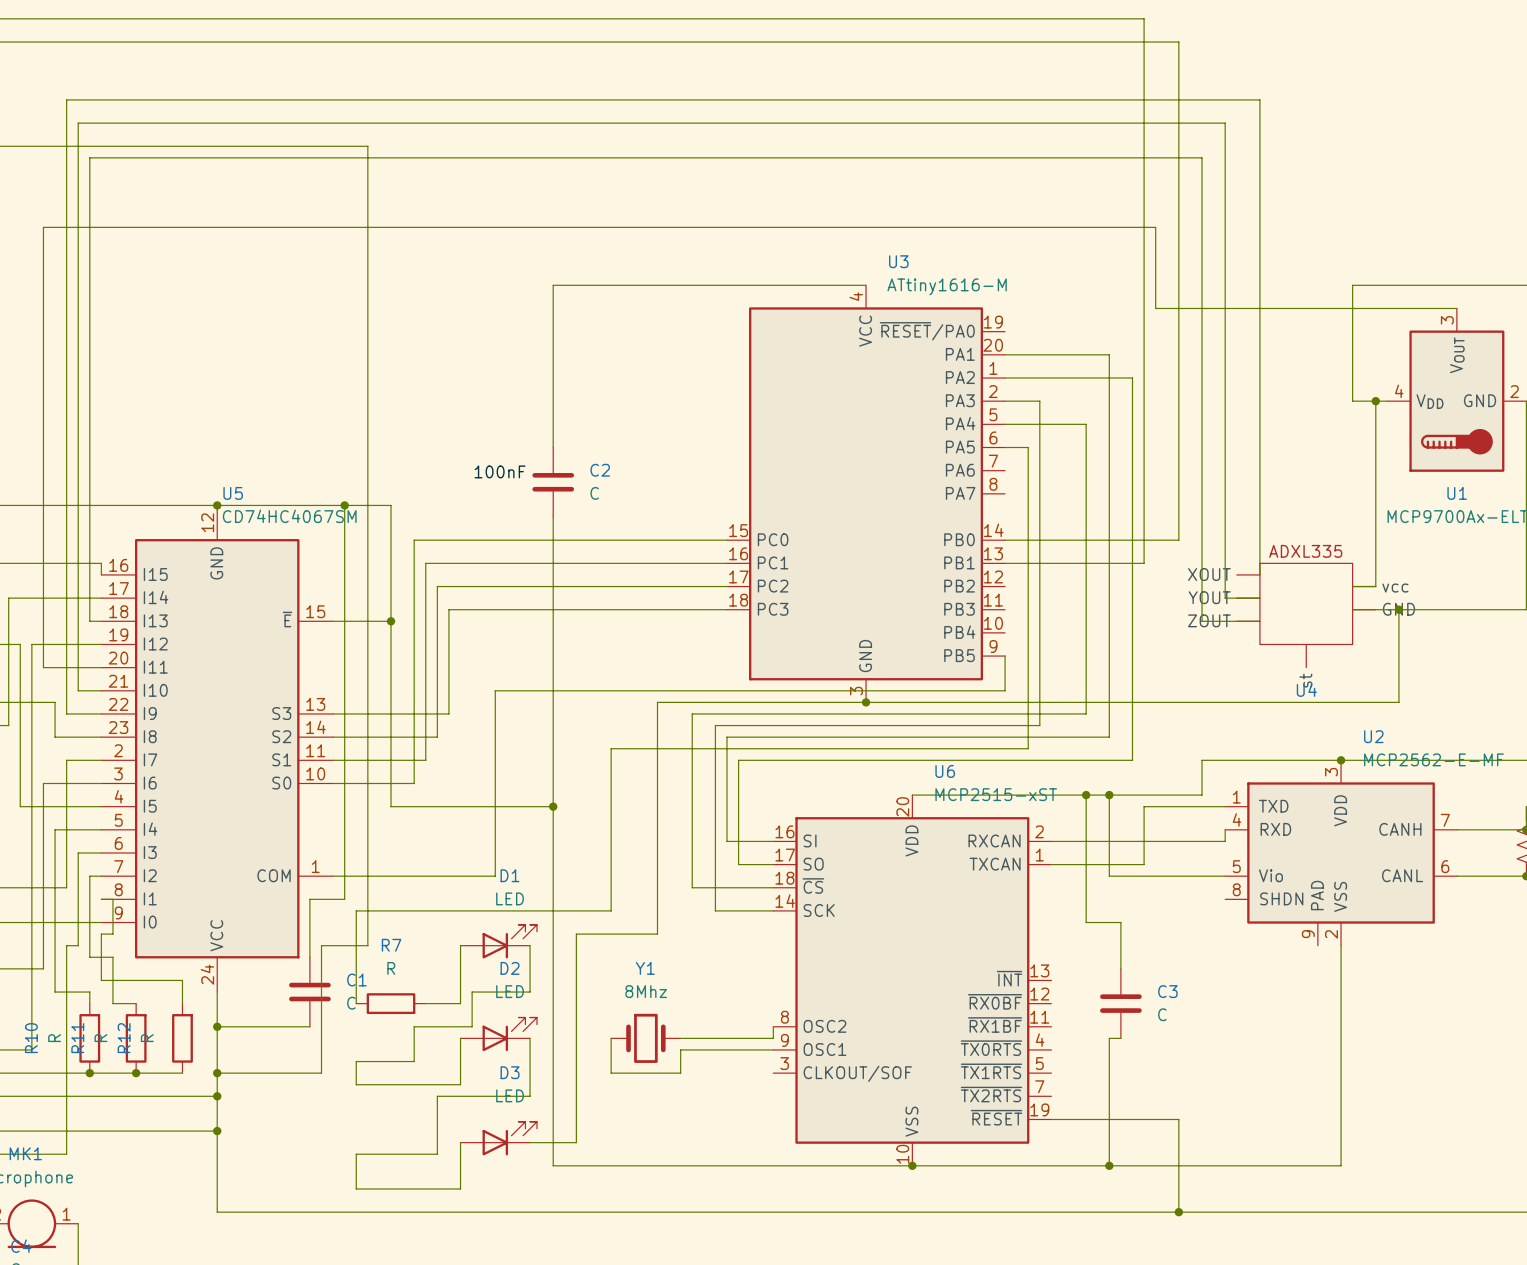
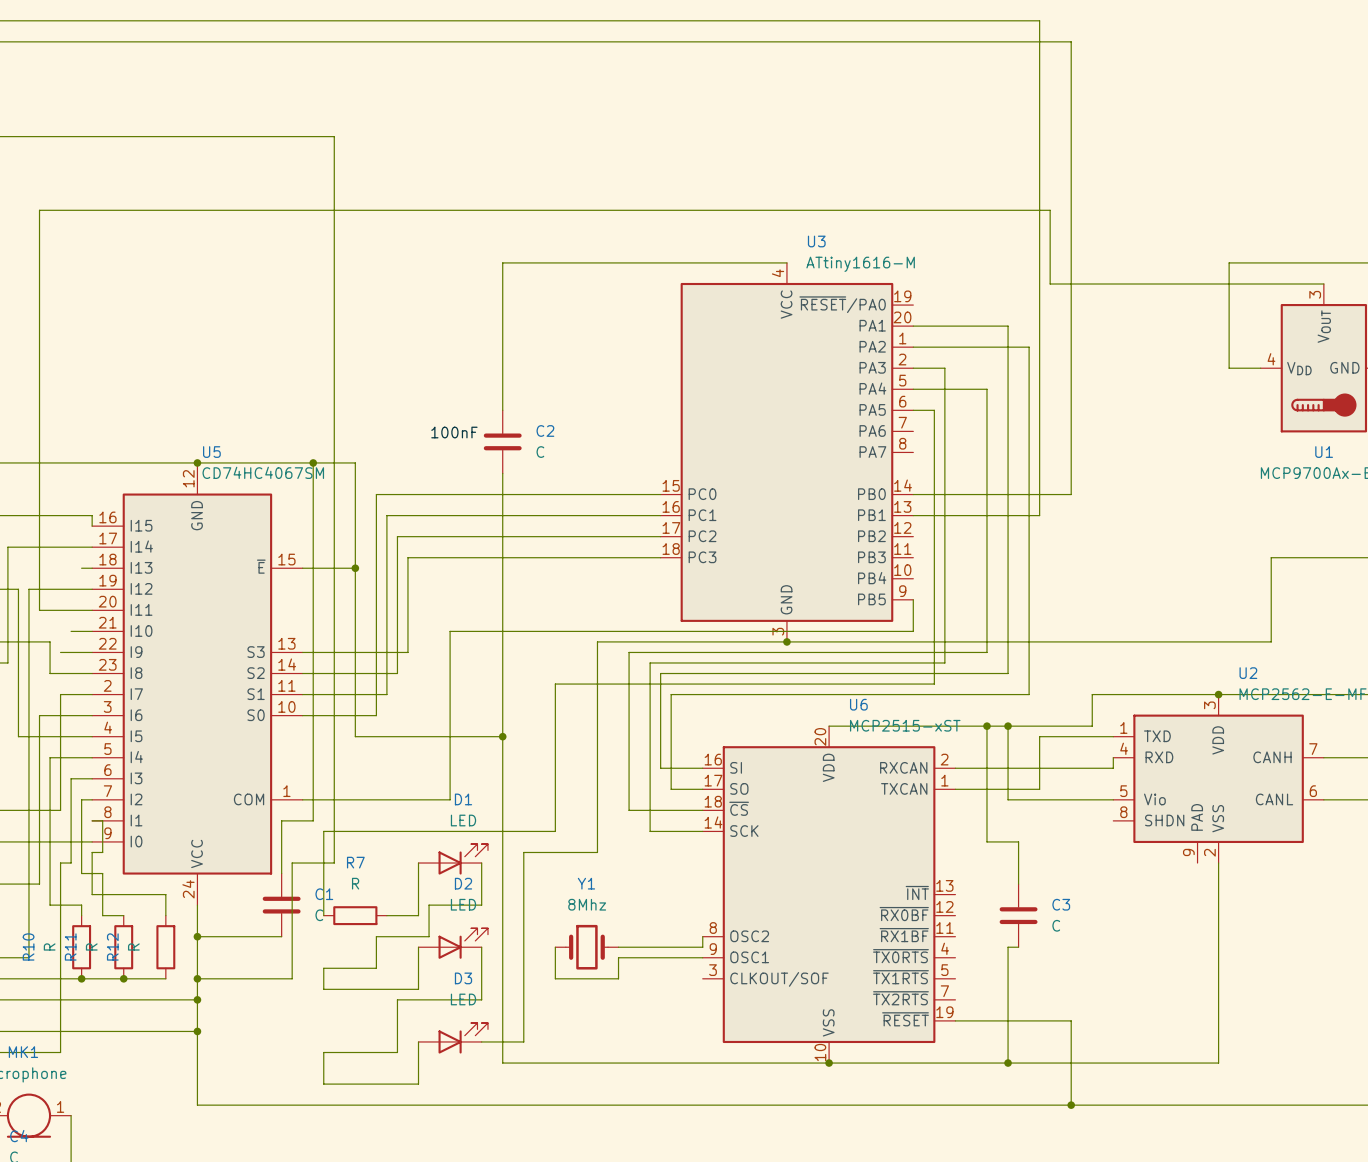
wire: (1375, 401) (1375, 586) (1352, 586) -> none
junction: (1375, 401) -> none
wire: (1259, 574) (1259, 99) (66, 99) (66, 713) -> none
wire: (1259, 598) (1225, 598) (1225, 123) (78, 123) (78, 690) -> none
wire: (1352, 609) (1398, 609) -> none
junction: (1398, 609) -> none
U4: (1306, 615) -> none
wire: (89, 621) (89, 157) (1202, 157) (1202, 621) (1259, 621) -> none

